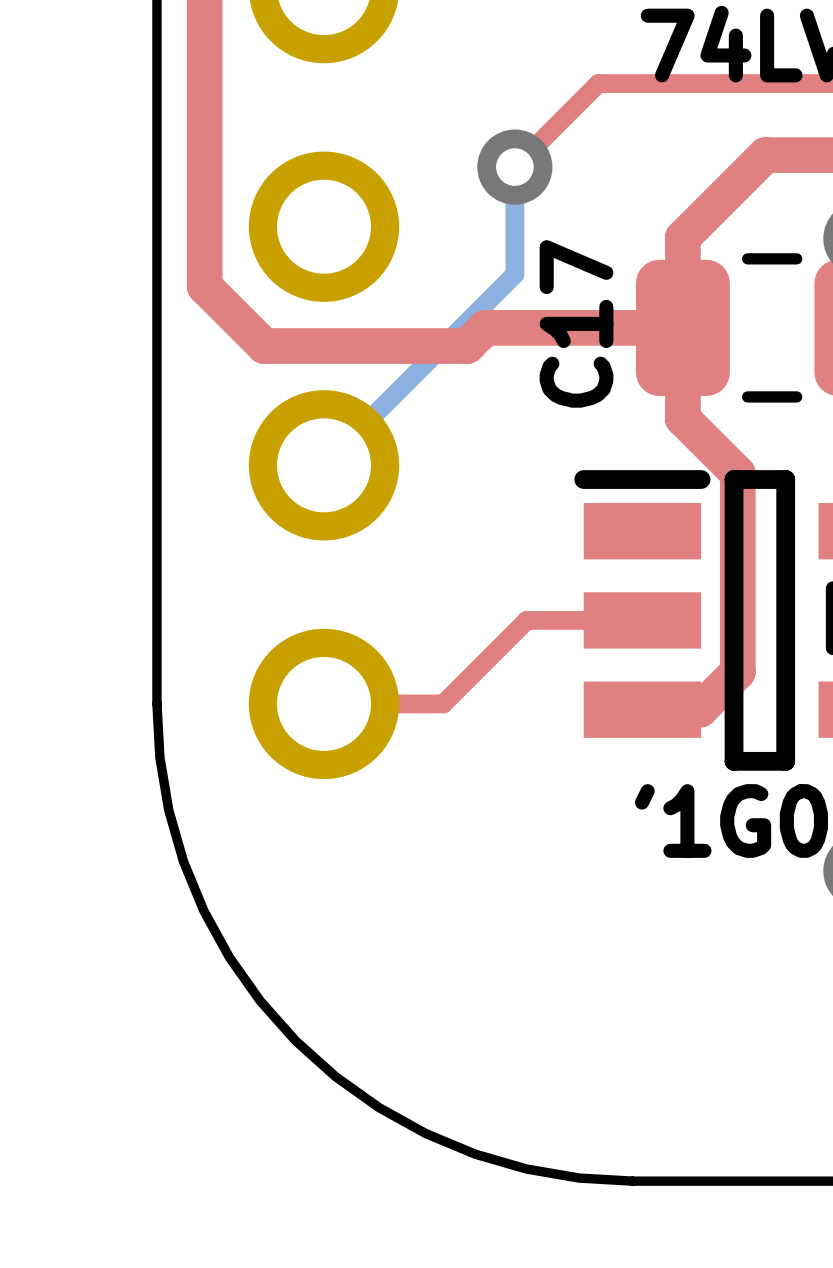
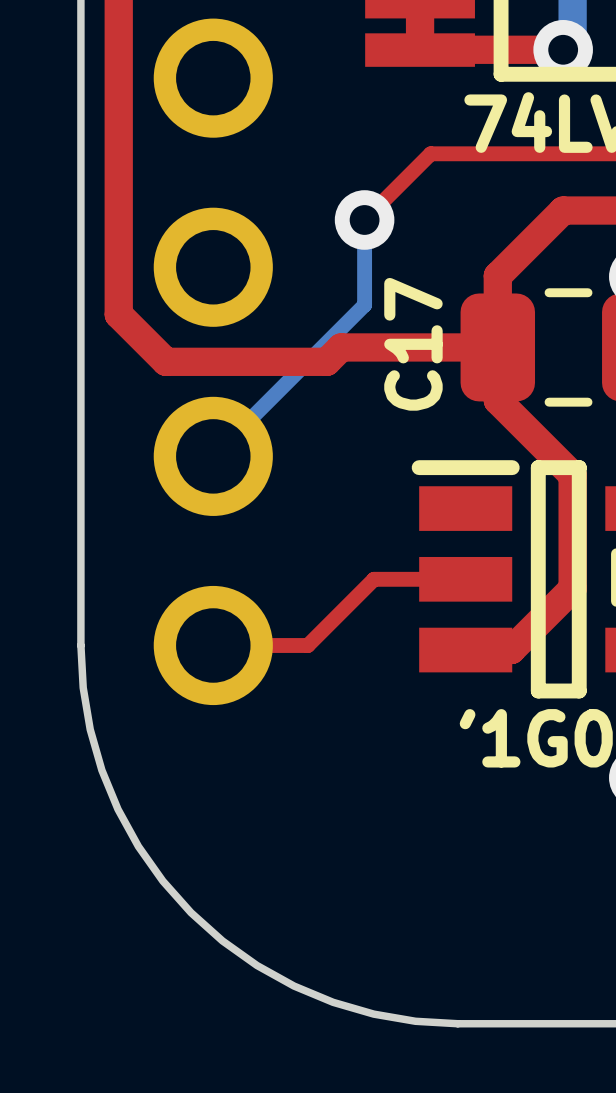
top track: (682, 394) (682, 418) (737, 473) (737, 671) -> (497, 400) (572, 475) (572, 588) (541, 620)

